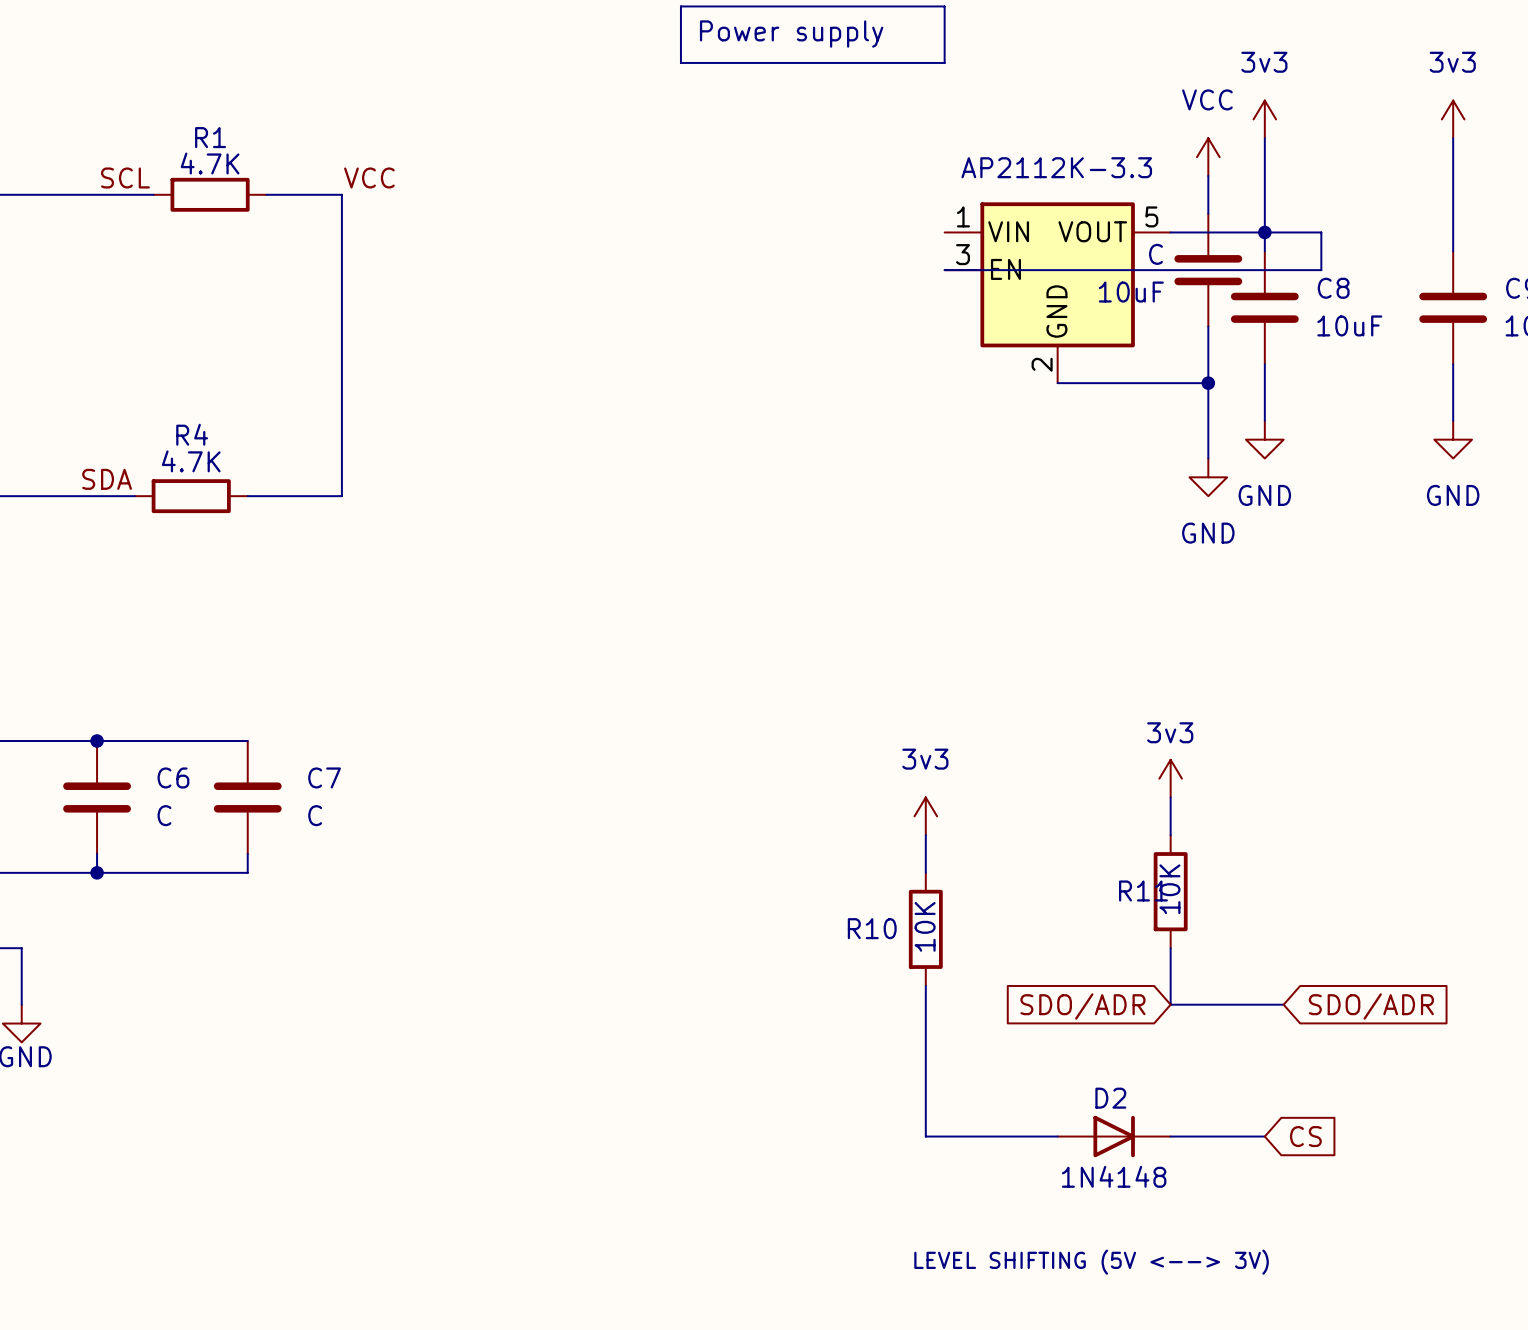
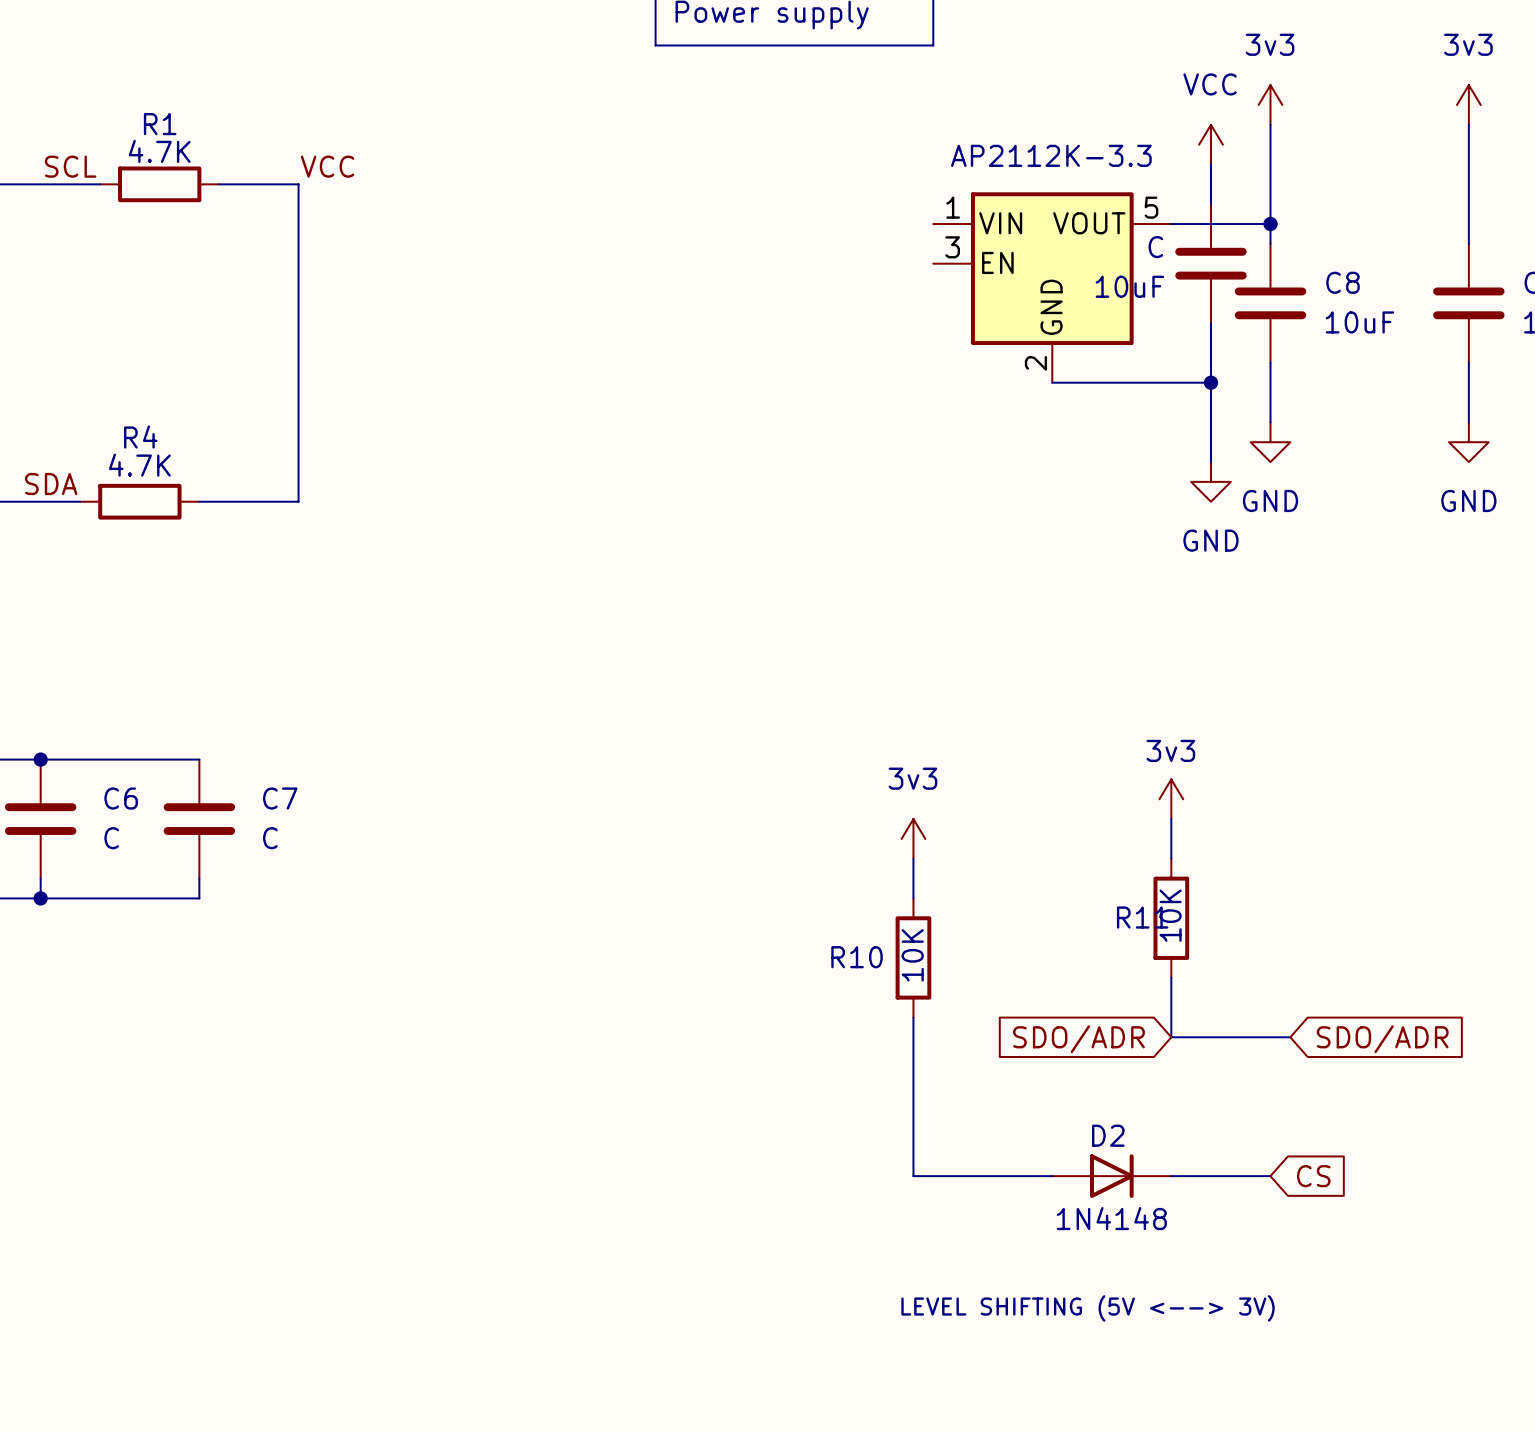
wire: (1264, 232) (1321, 232) (1321, 270) (944, 270) -> none

